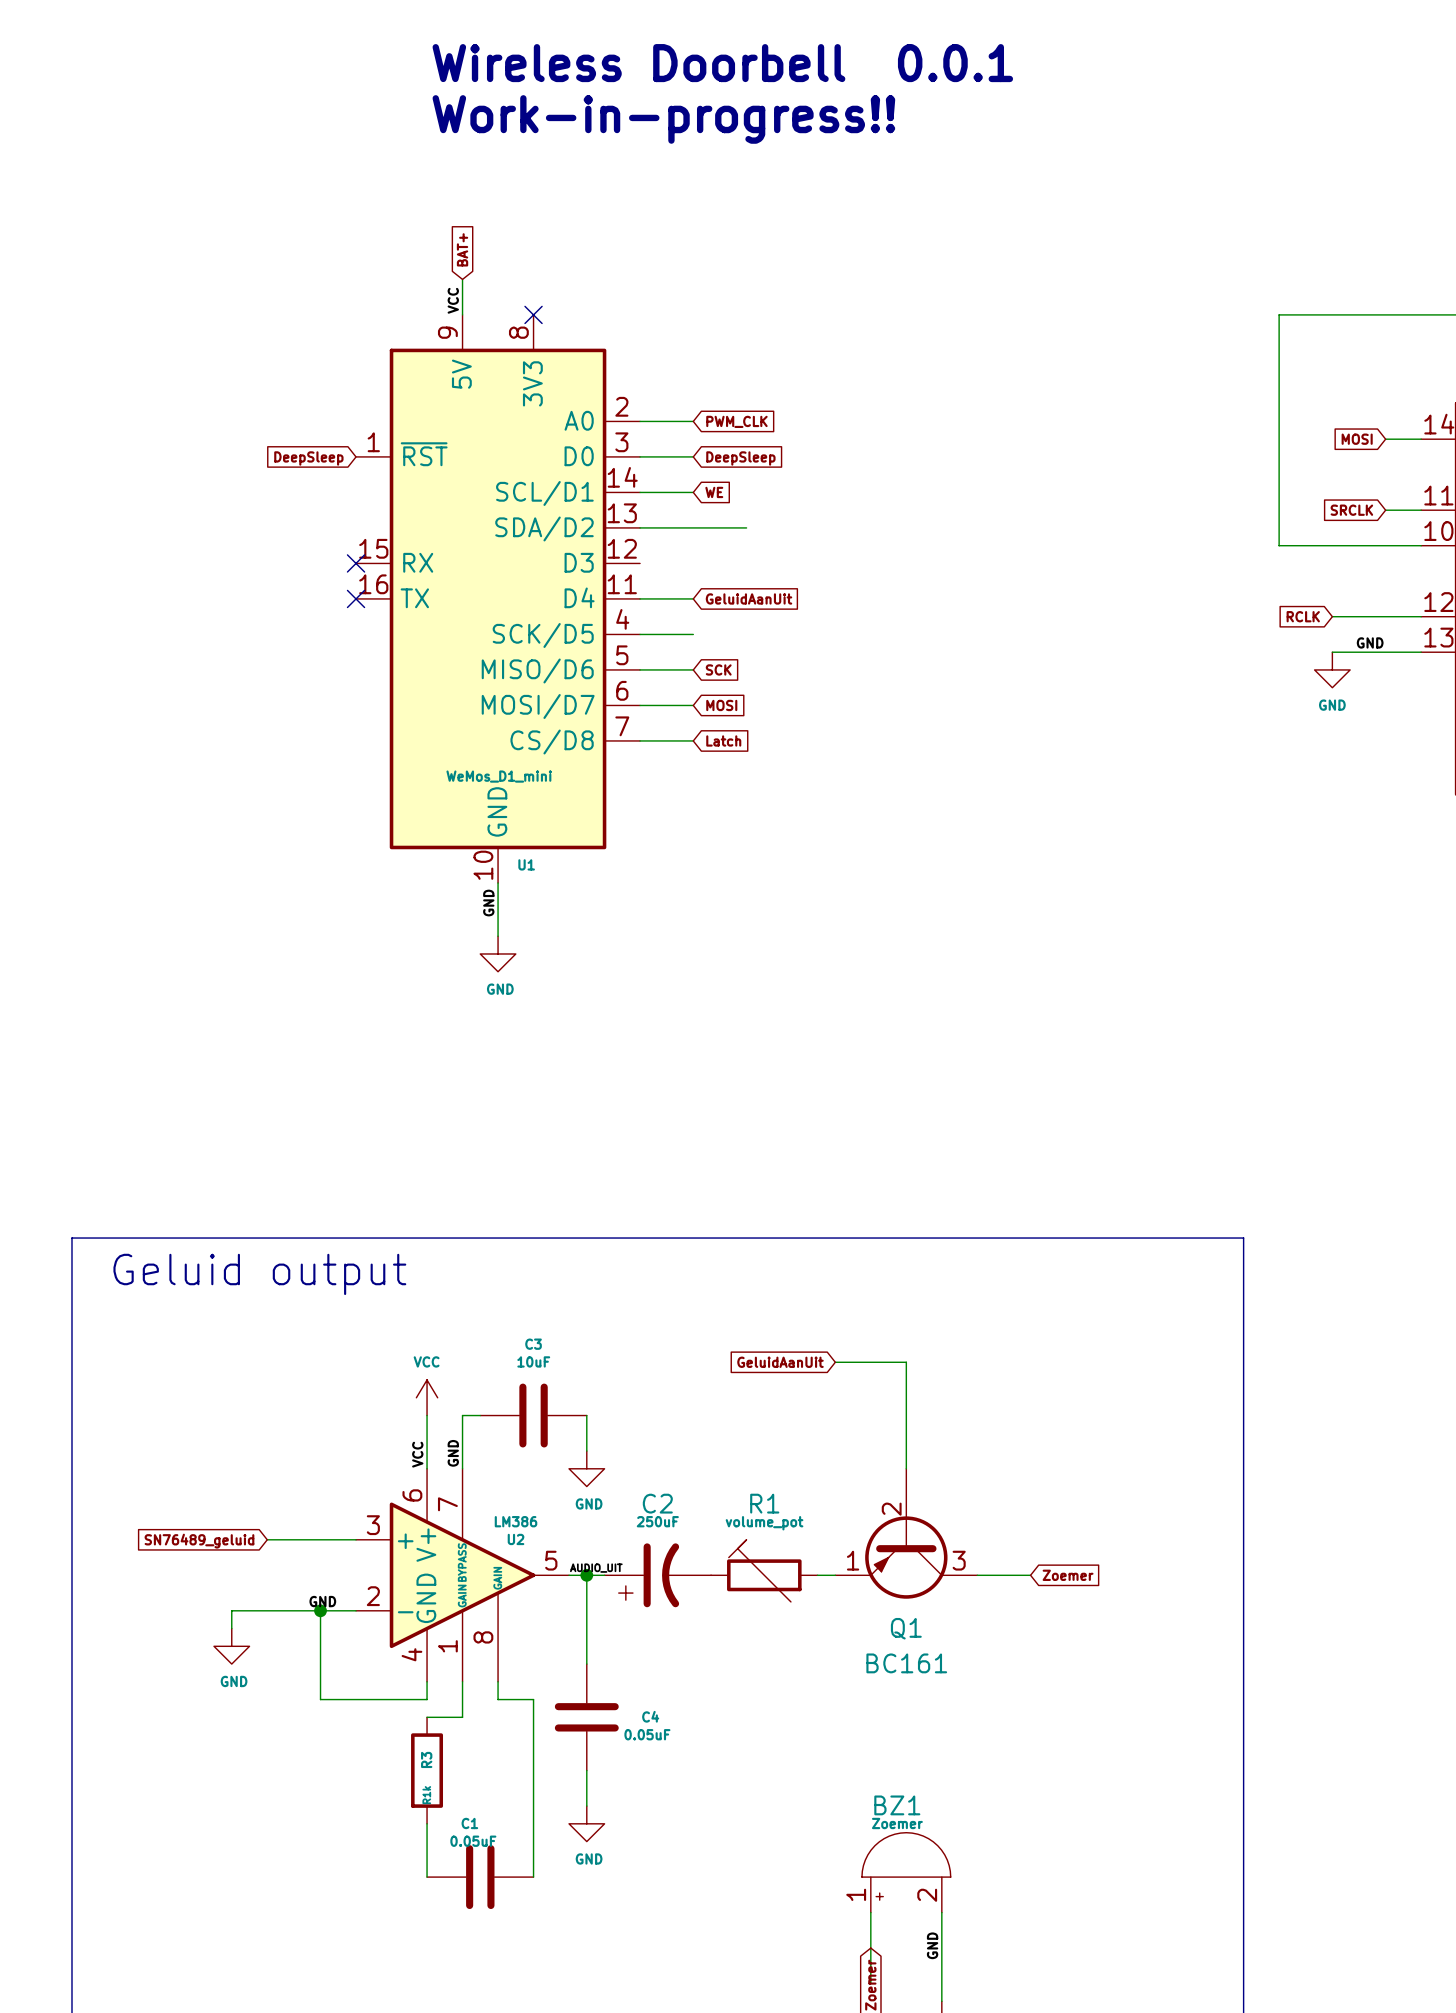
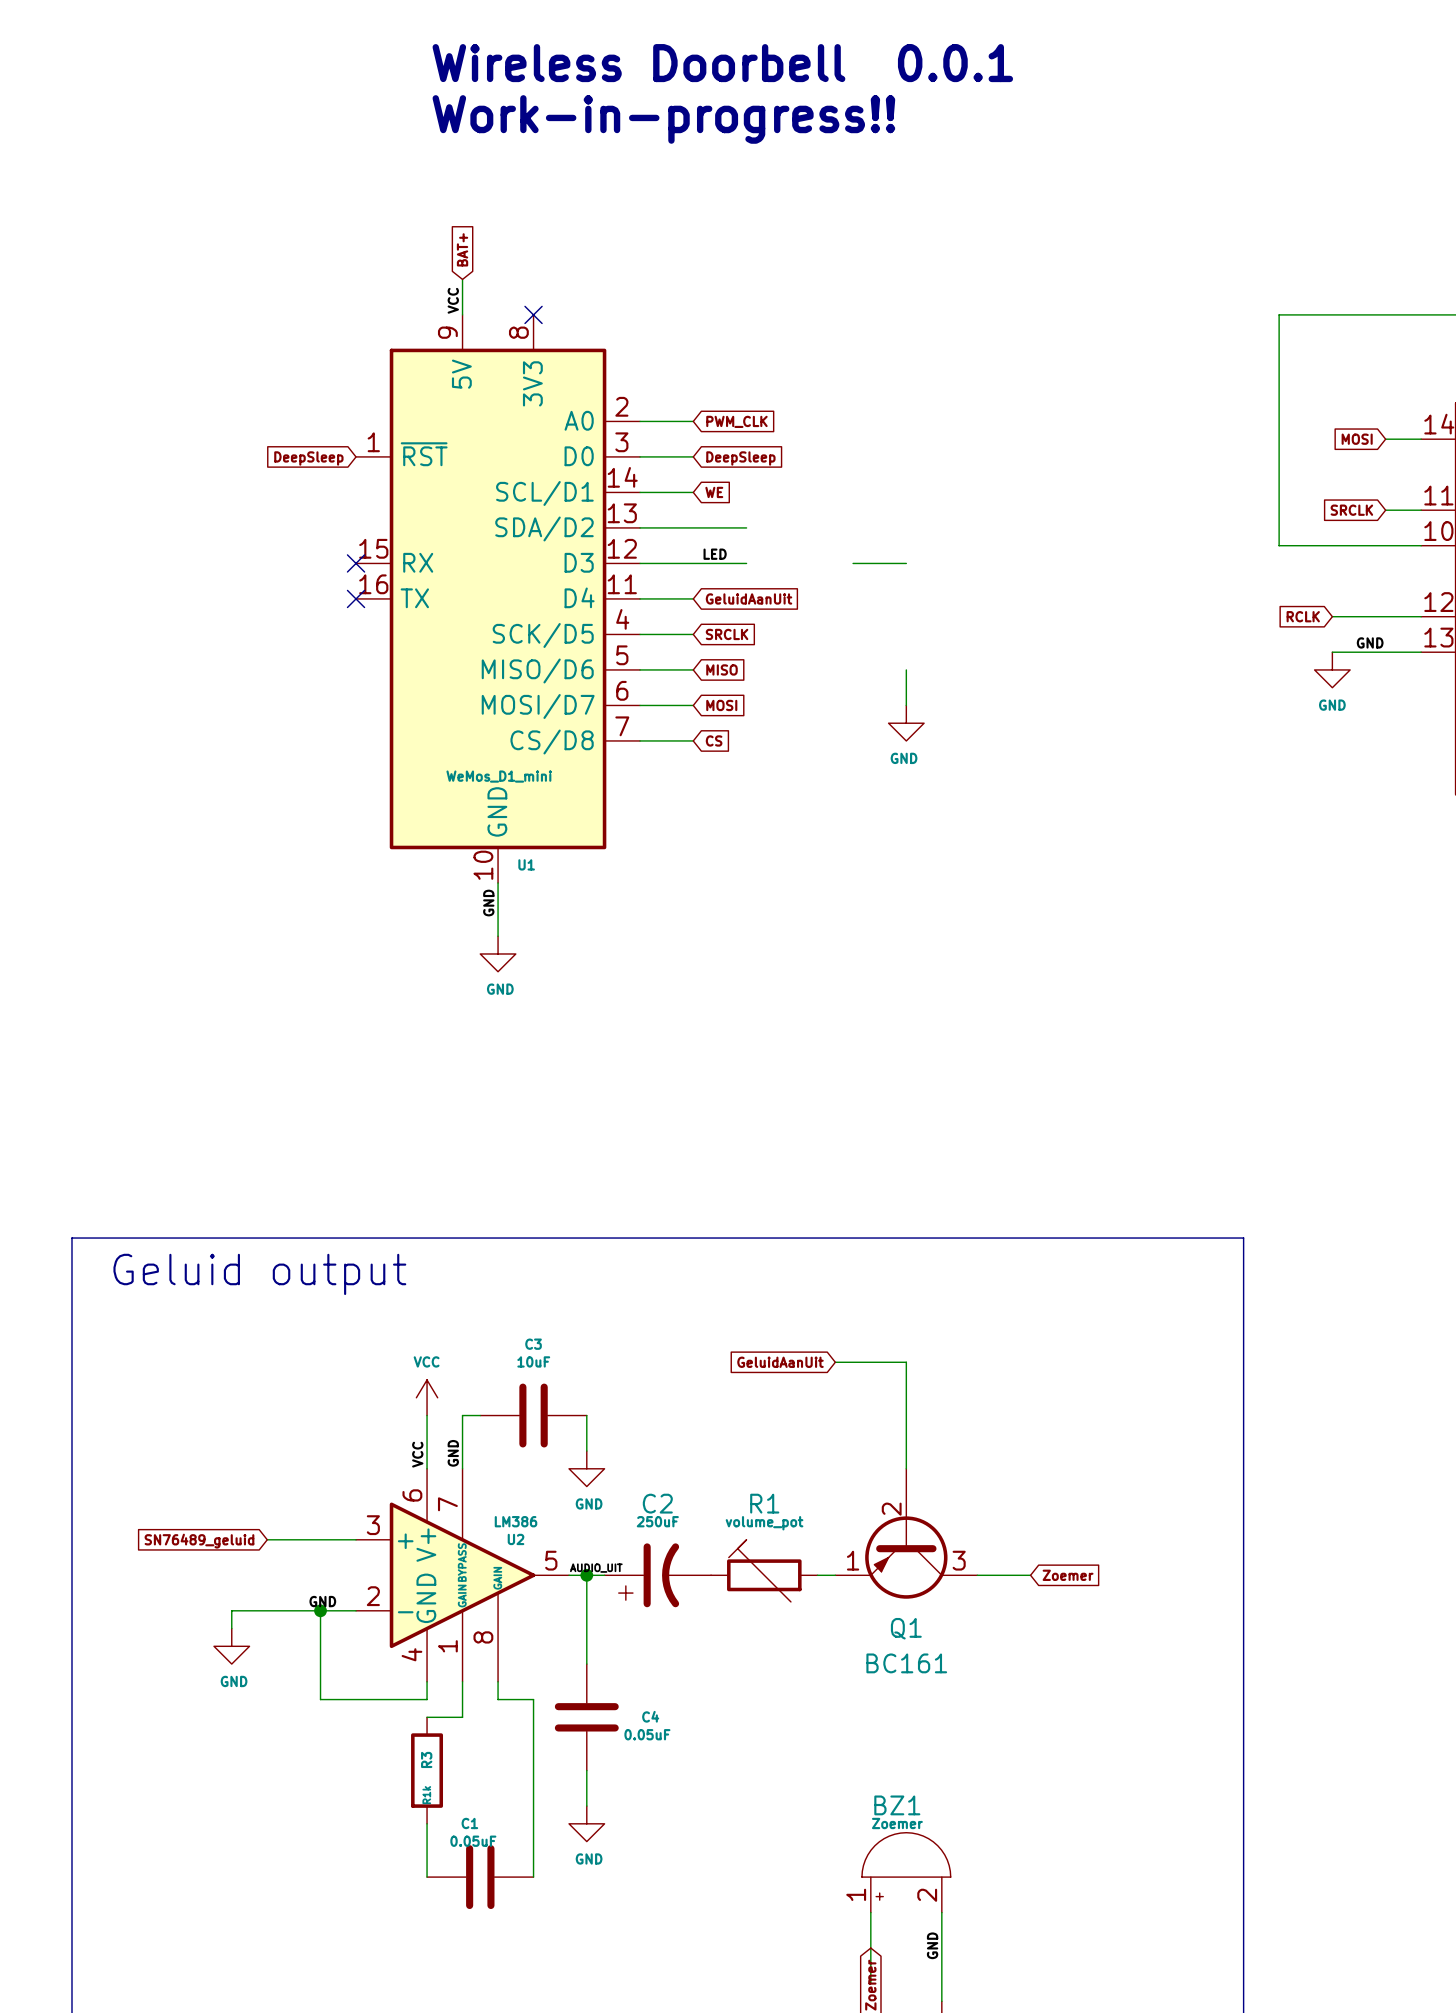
label: none -> LED (715, 554)
wire: none -> (640, 563) (746, 563)
wire: none -> (853, 563) (906, 563)
global label: none -> SRCLK (727, 634)
global label: SCK (718, 669) -> MISO (722, 669)
wire: none -> (906, 669) (906, 705)
power symbol: none -> GND (906, 723)
global label: Latch (723, 740) -> CS (714, 740)

